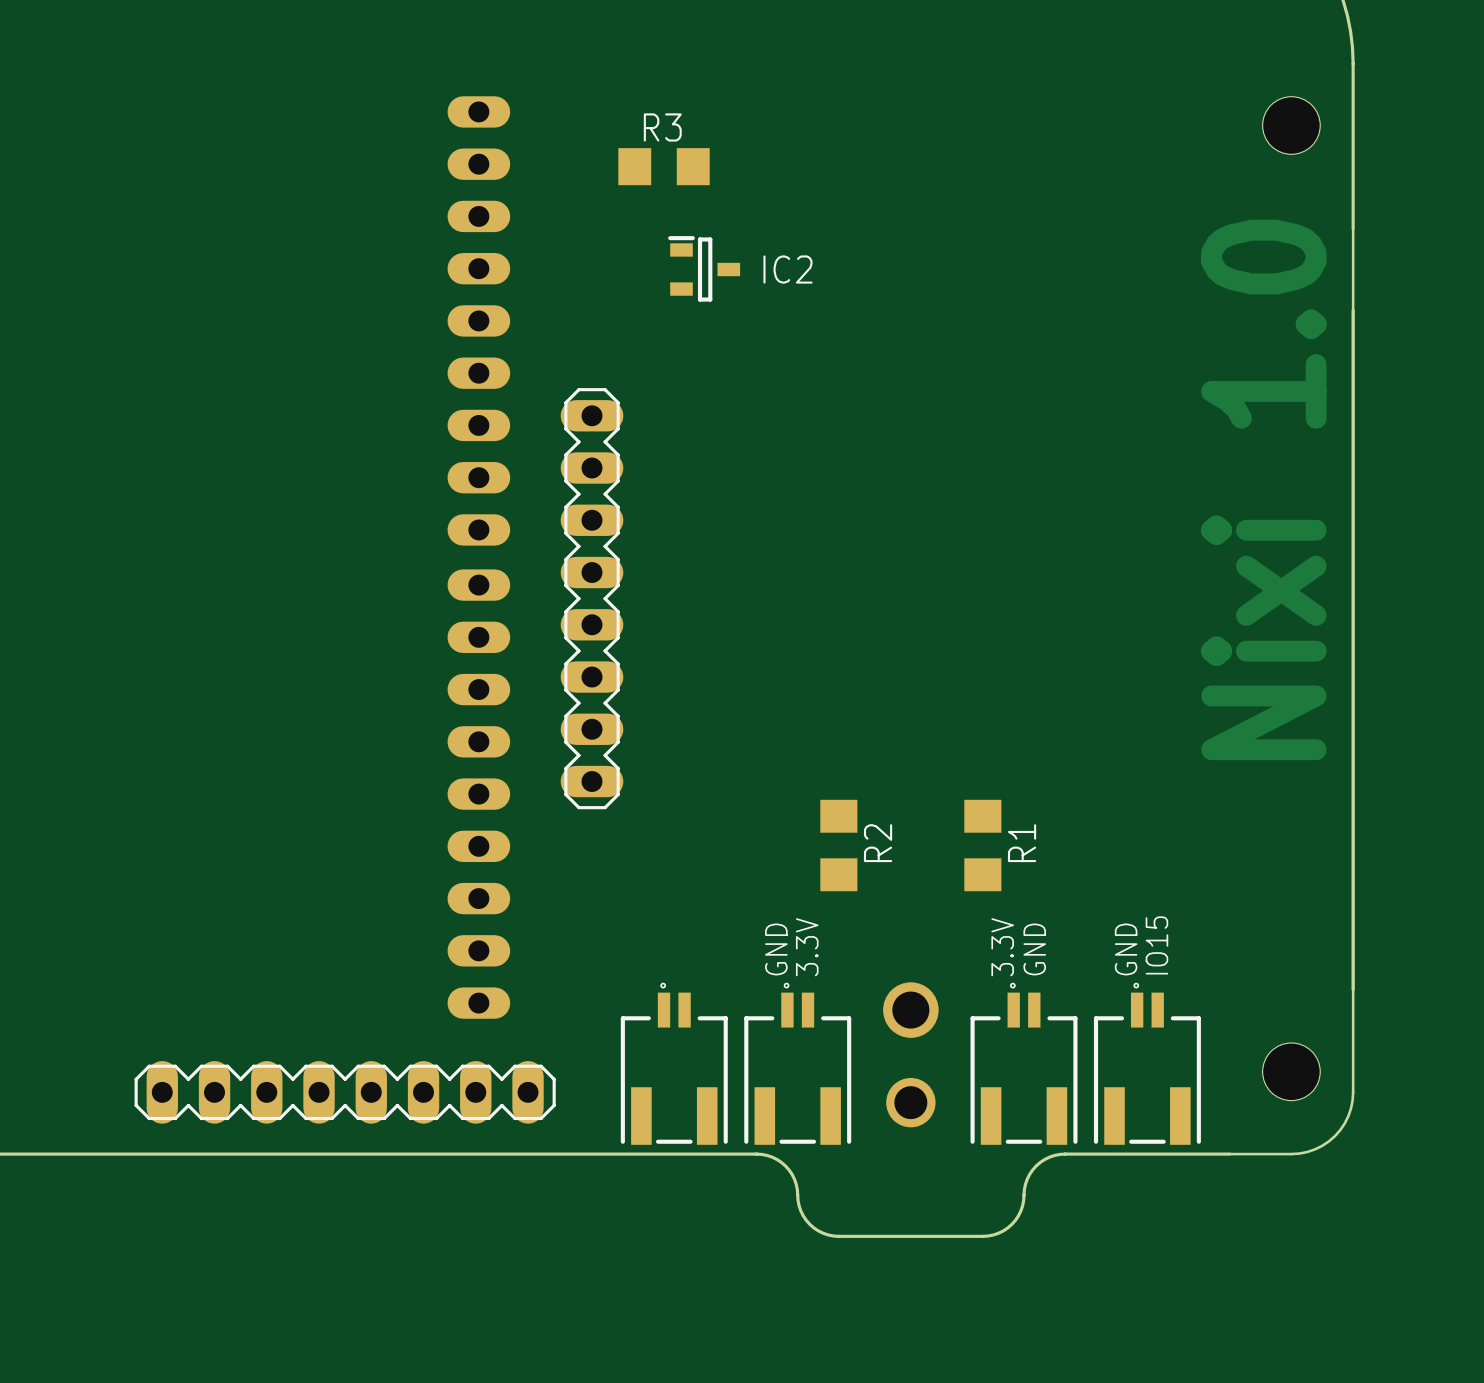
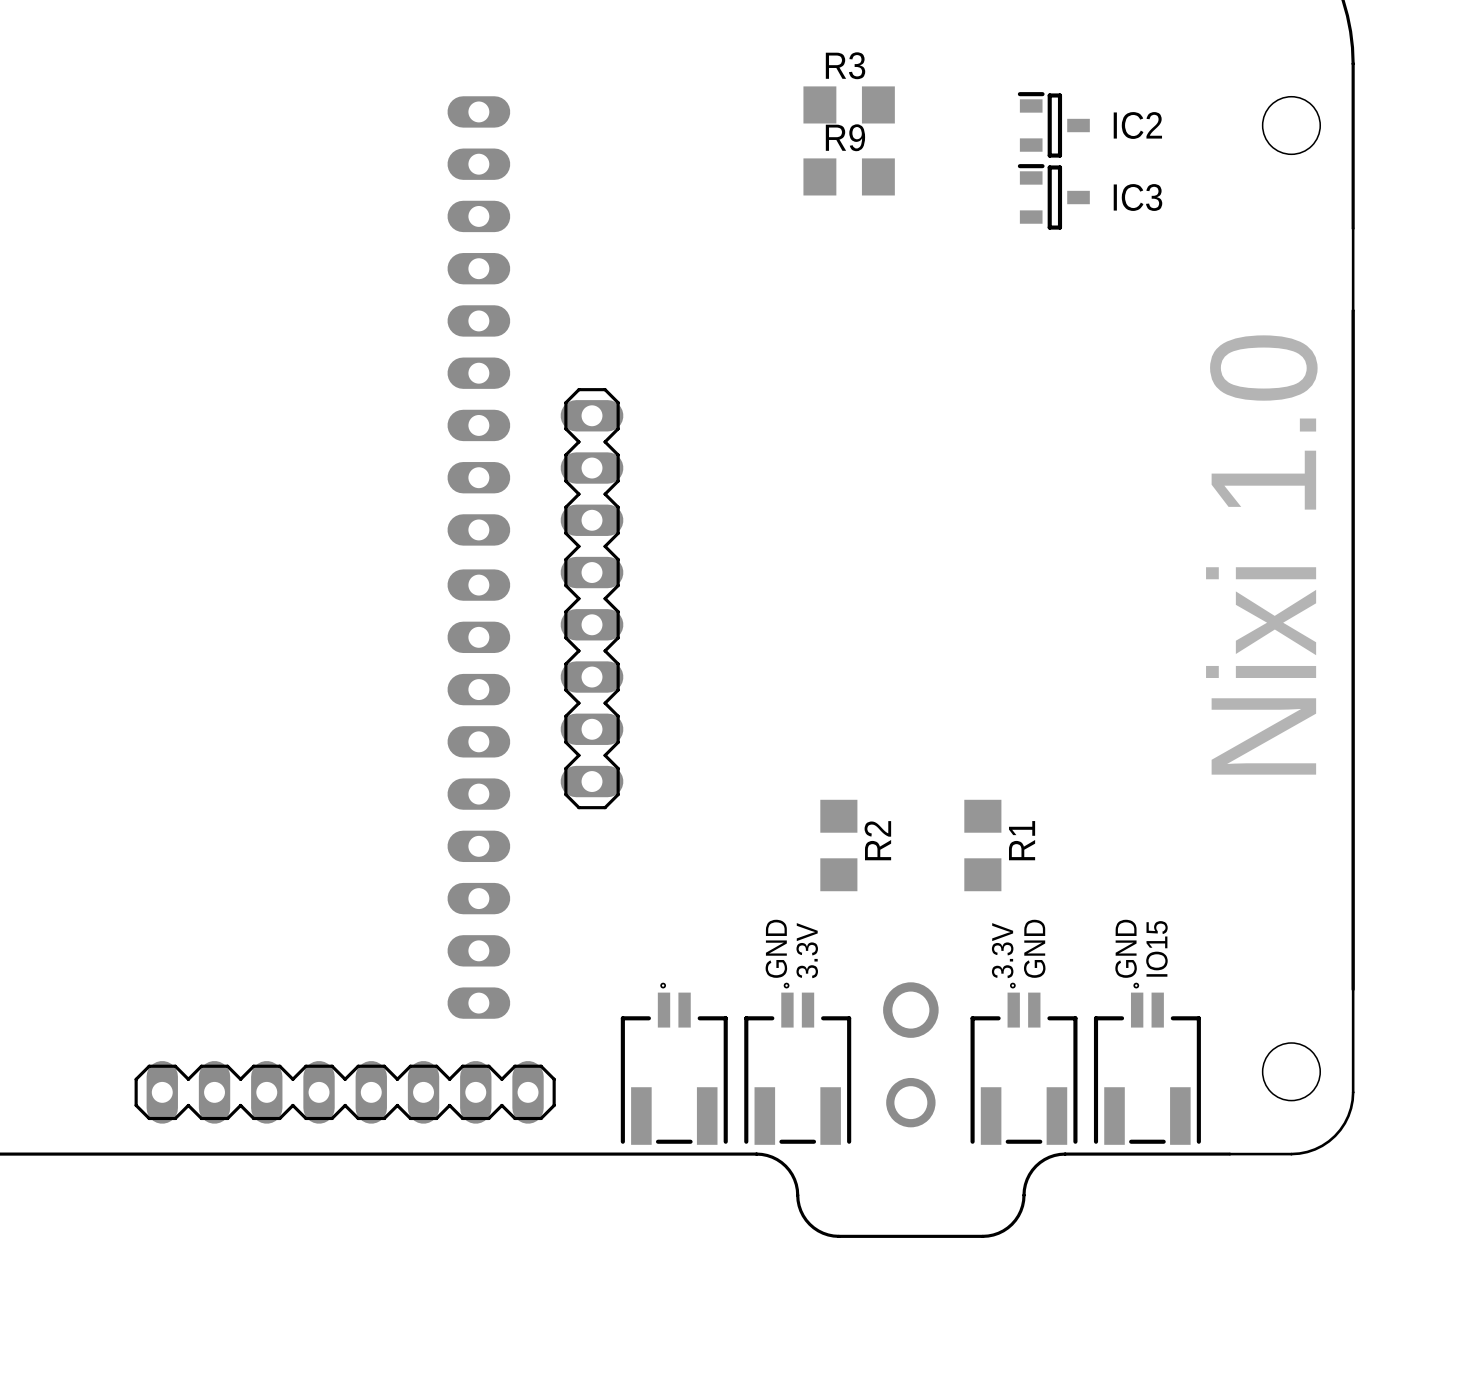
R3 position: (664, 166) -> (849, 104)
R9: none -> (849, 176)
IC3: none -> (1053, 196)
IC2 position: (704, 268) -> (1053, 124)

